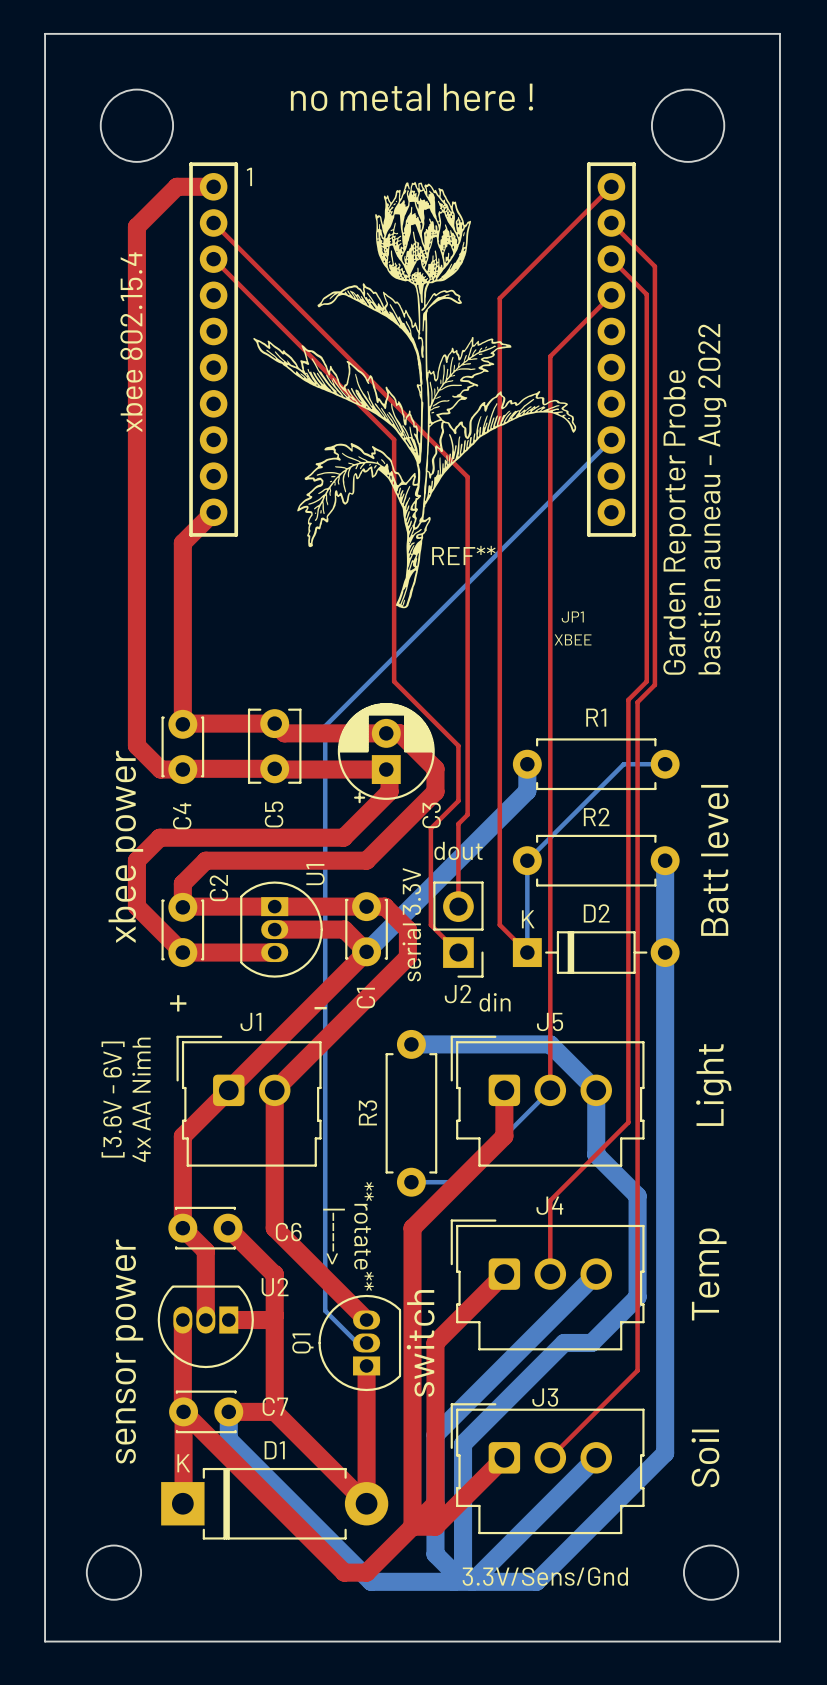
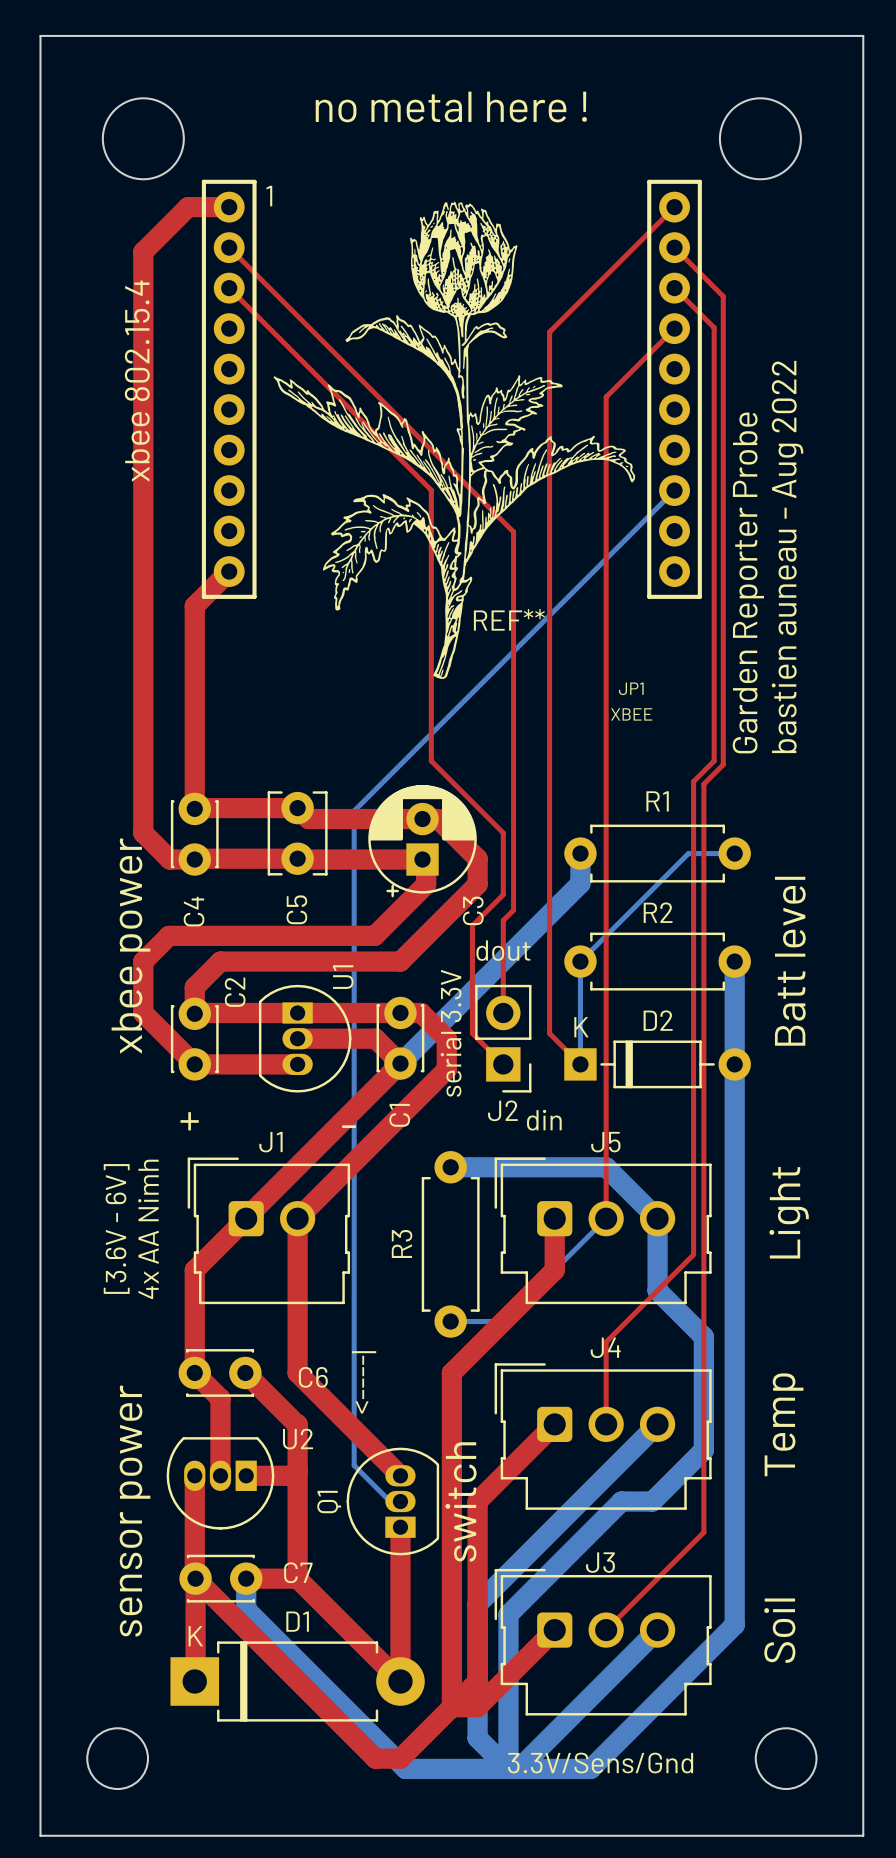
text: **rotate** (363, 1236) -> none

